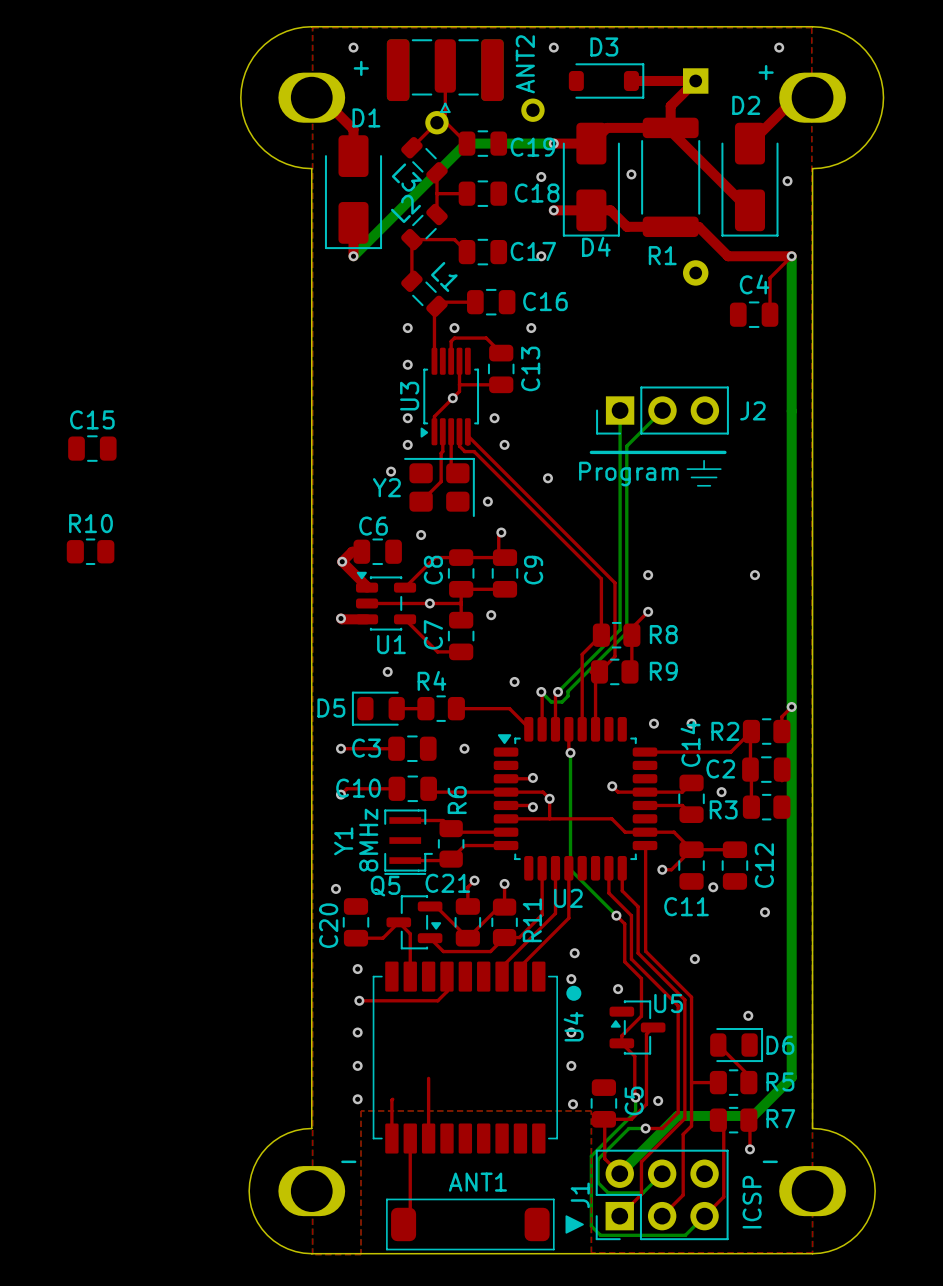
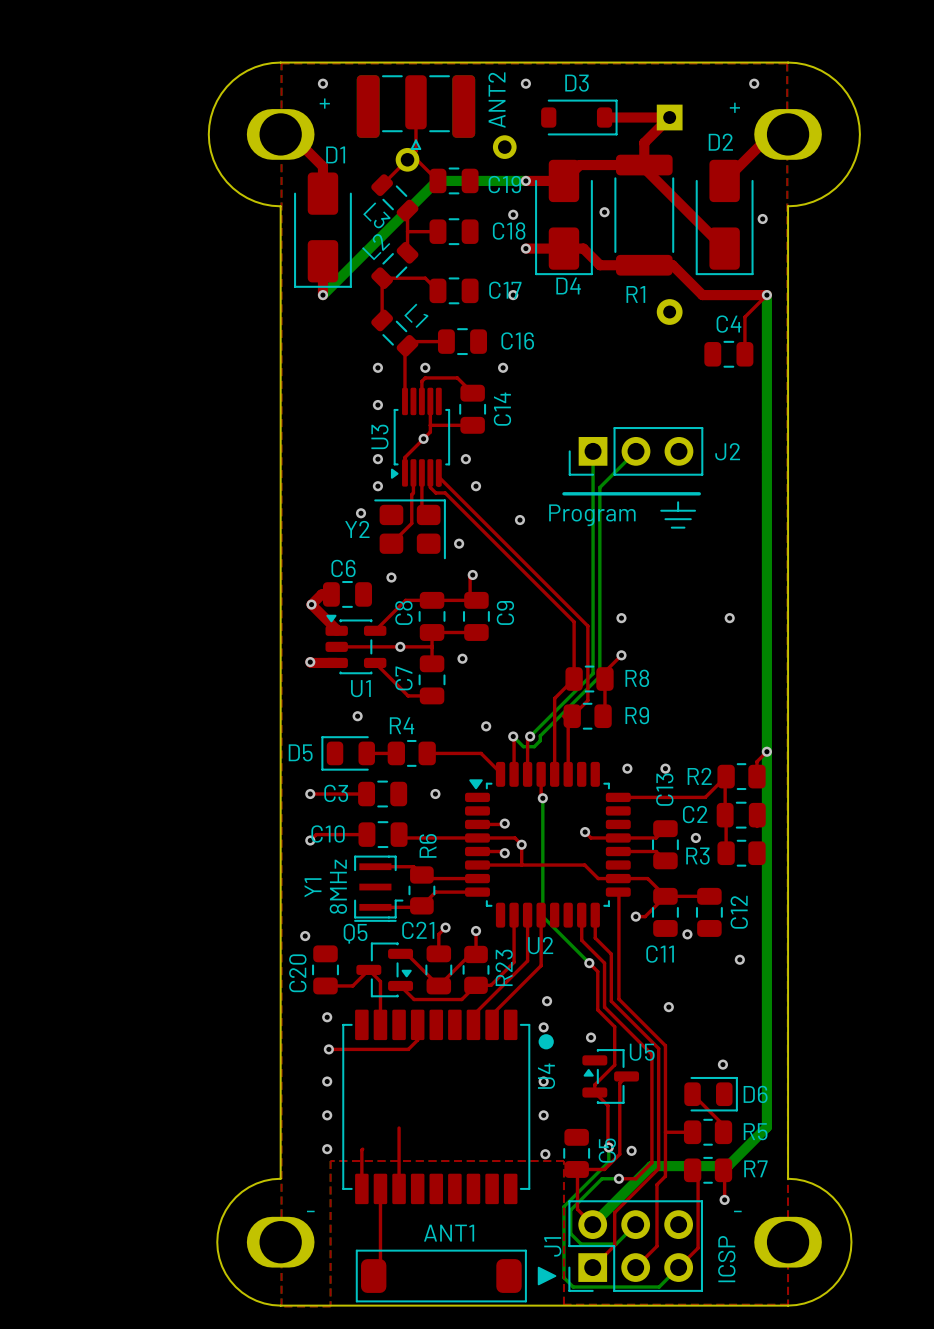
C13 name: C13 (530, 368) -> C14 (502, 409)
C15: (92, 448) -> none
R10: (90, 551) -> none
C14 name: C14 (690, 744) -> C13 (664, 789)
R11 name: R11 (532, 920) -> R23 (504, 967)

